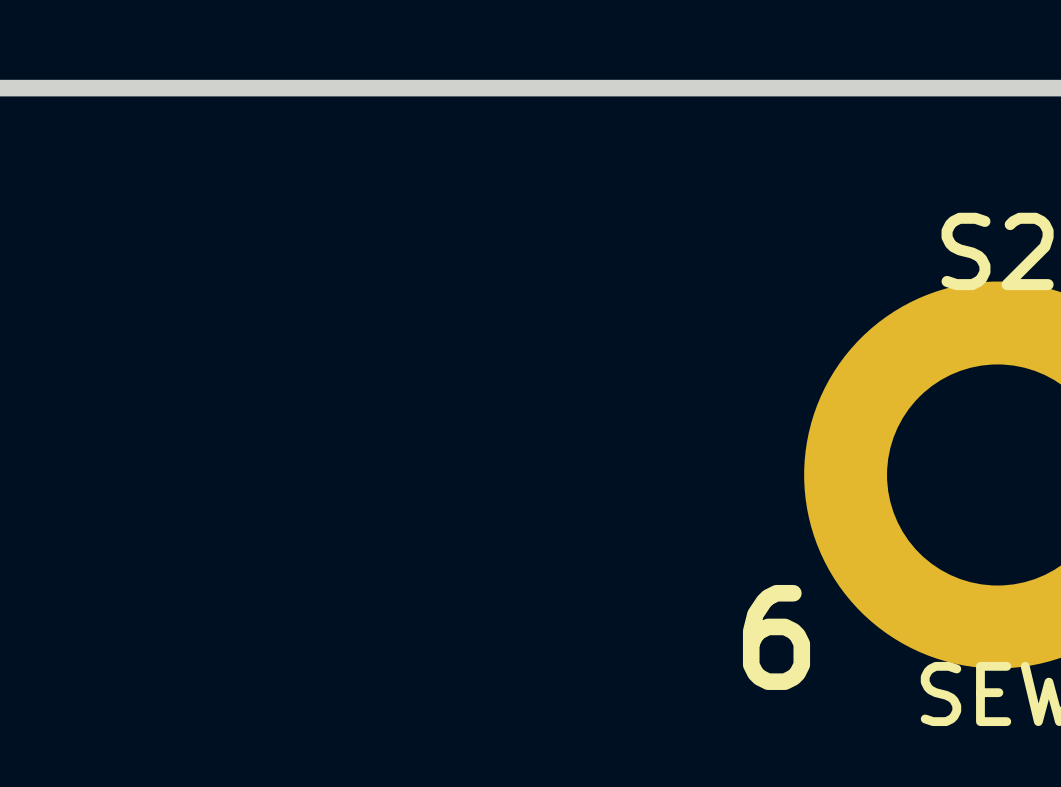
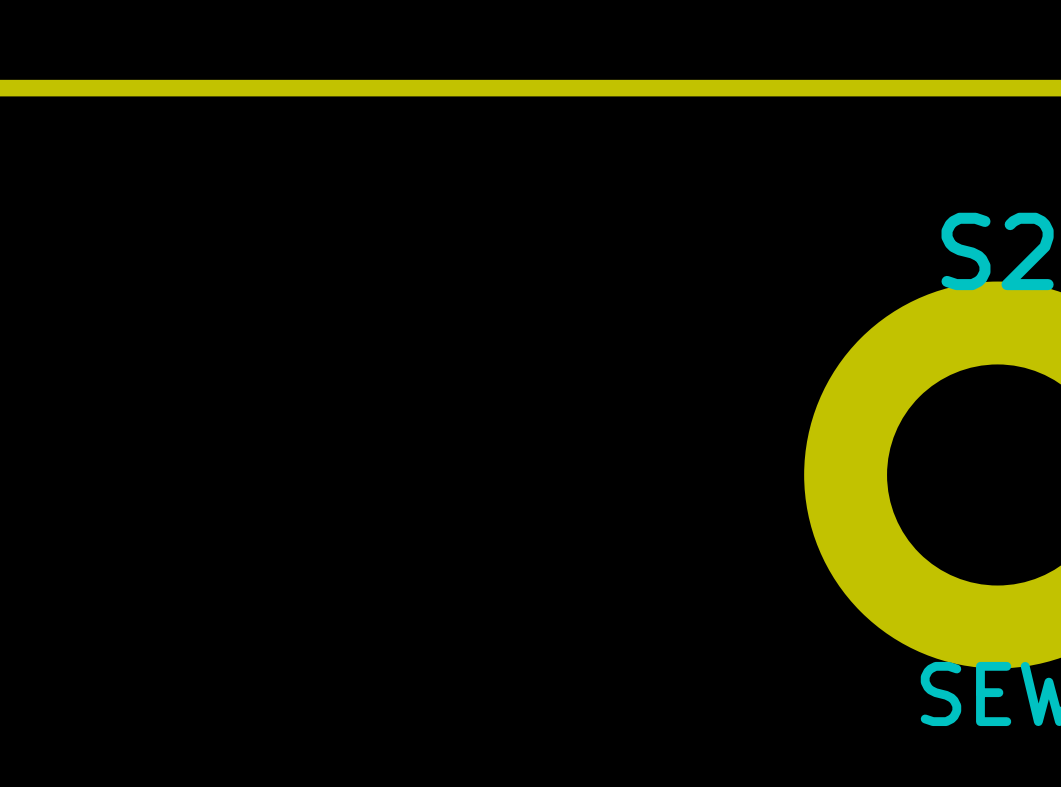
6 name: 6 (776, 637) -> none

